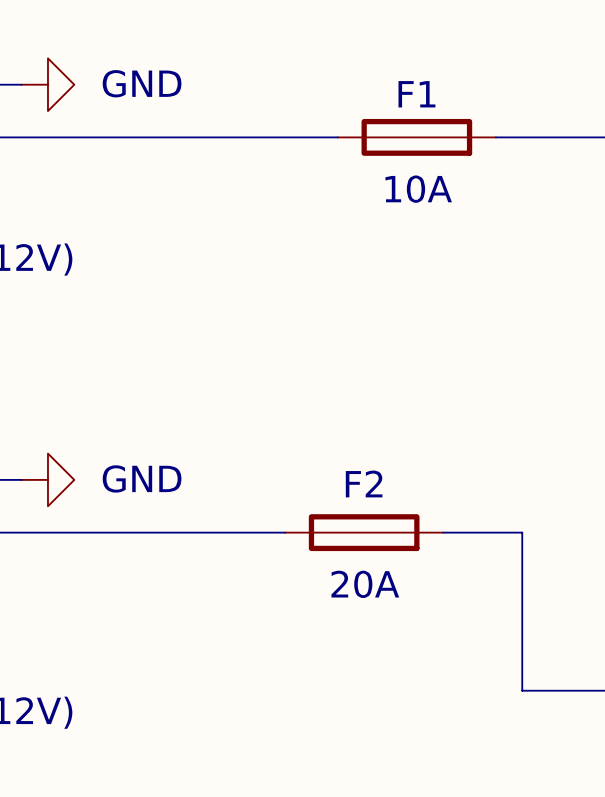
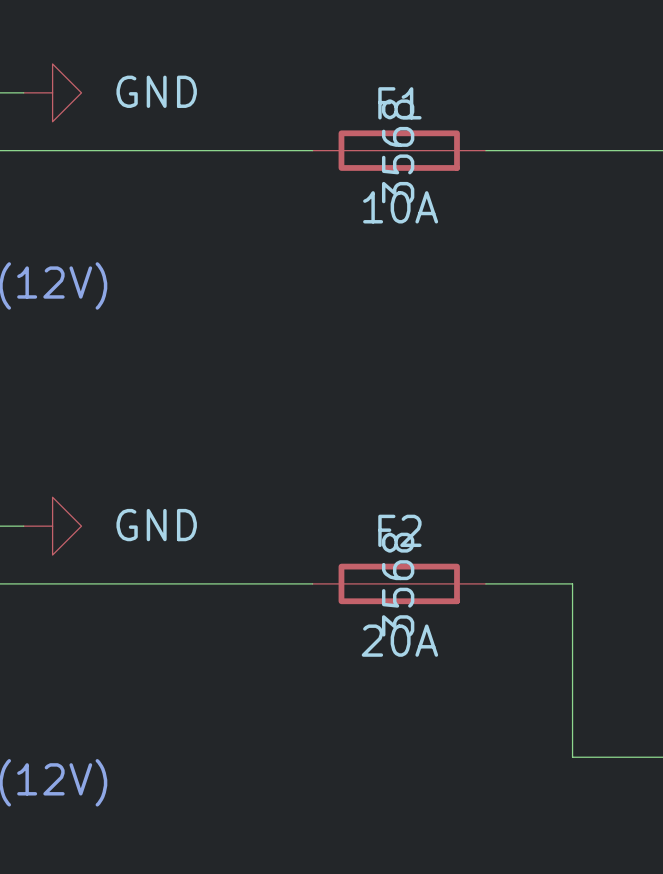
F1 text: none -> 3568 (398, 151)
F1 position: (416, 137) -> (399, 150)
F2 text: none -> 3568 (398, 584)

